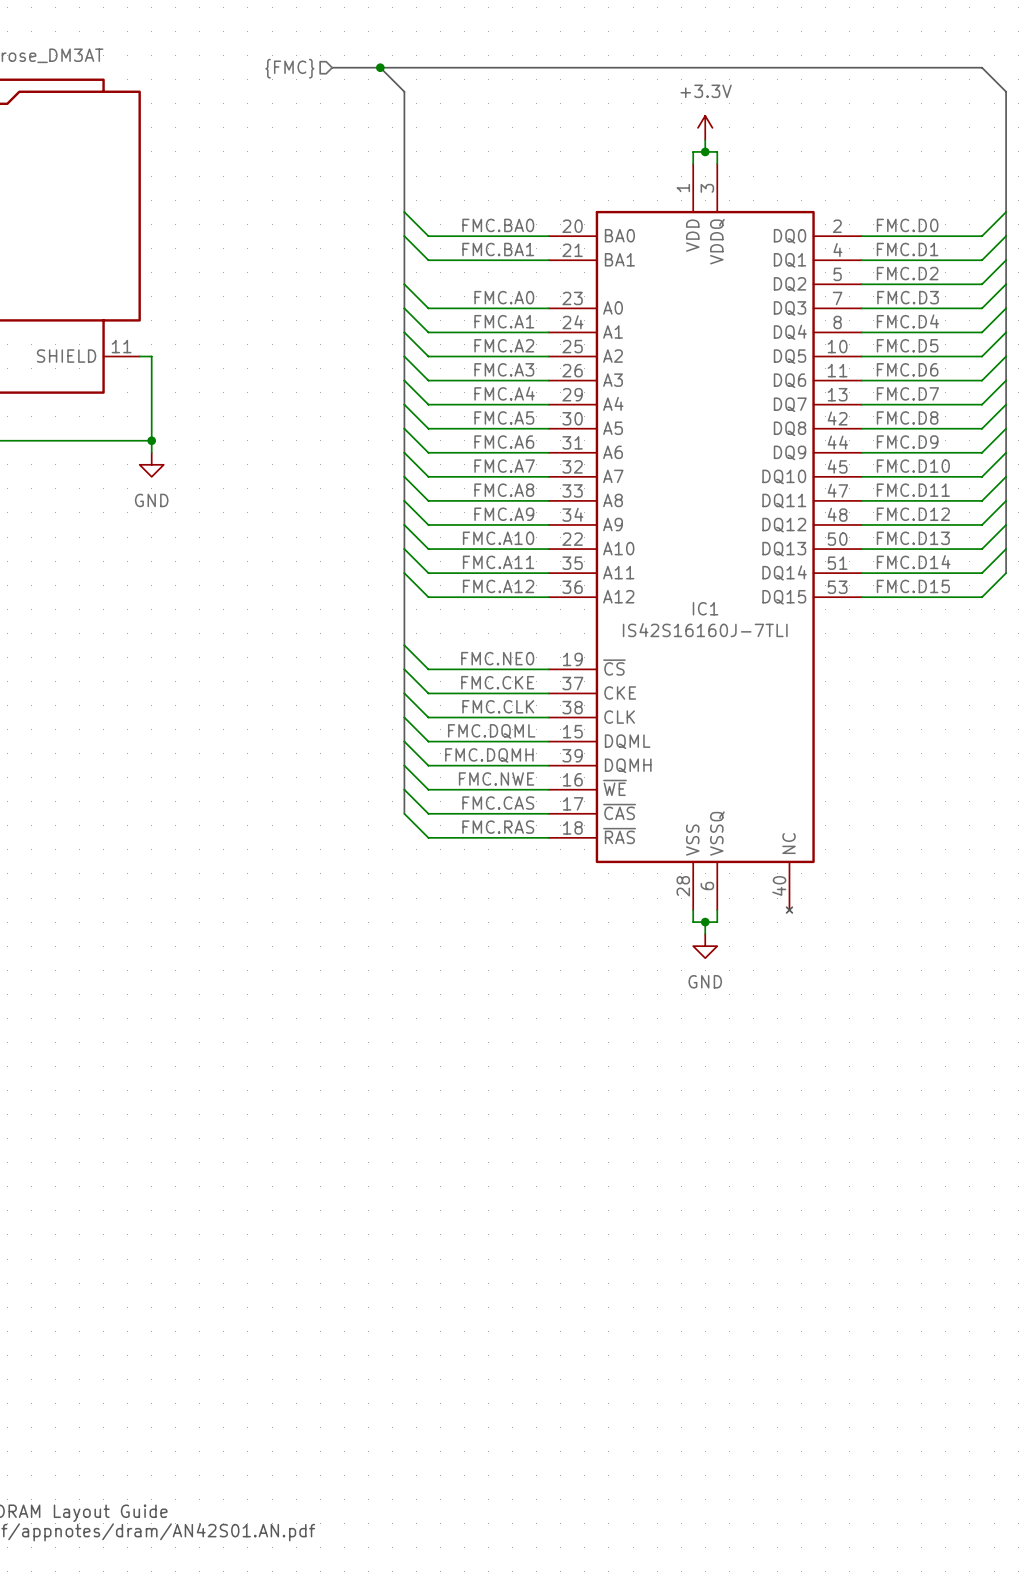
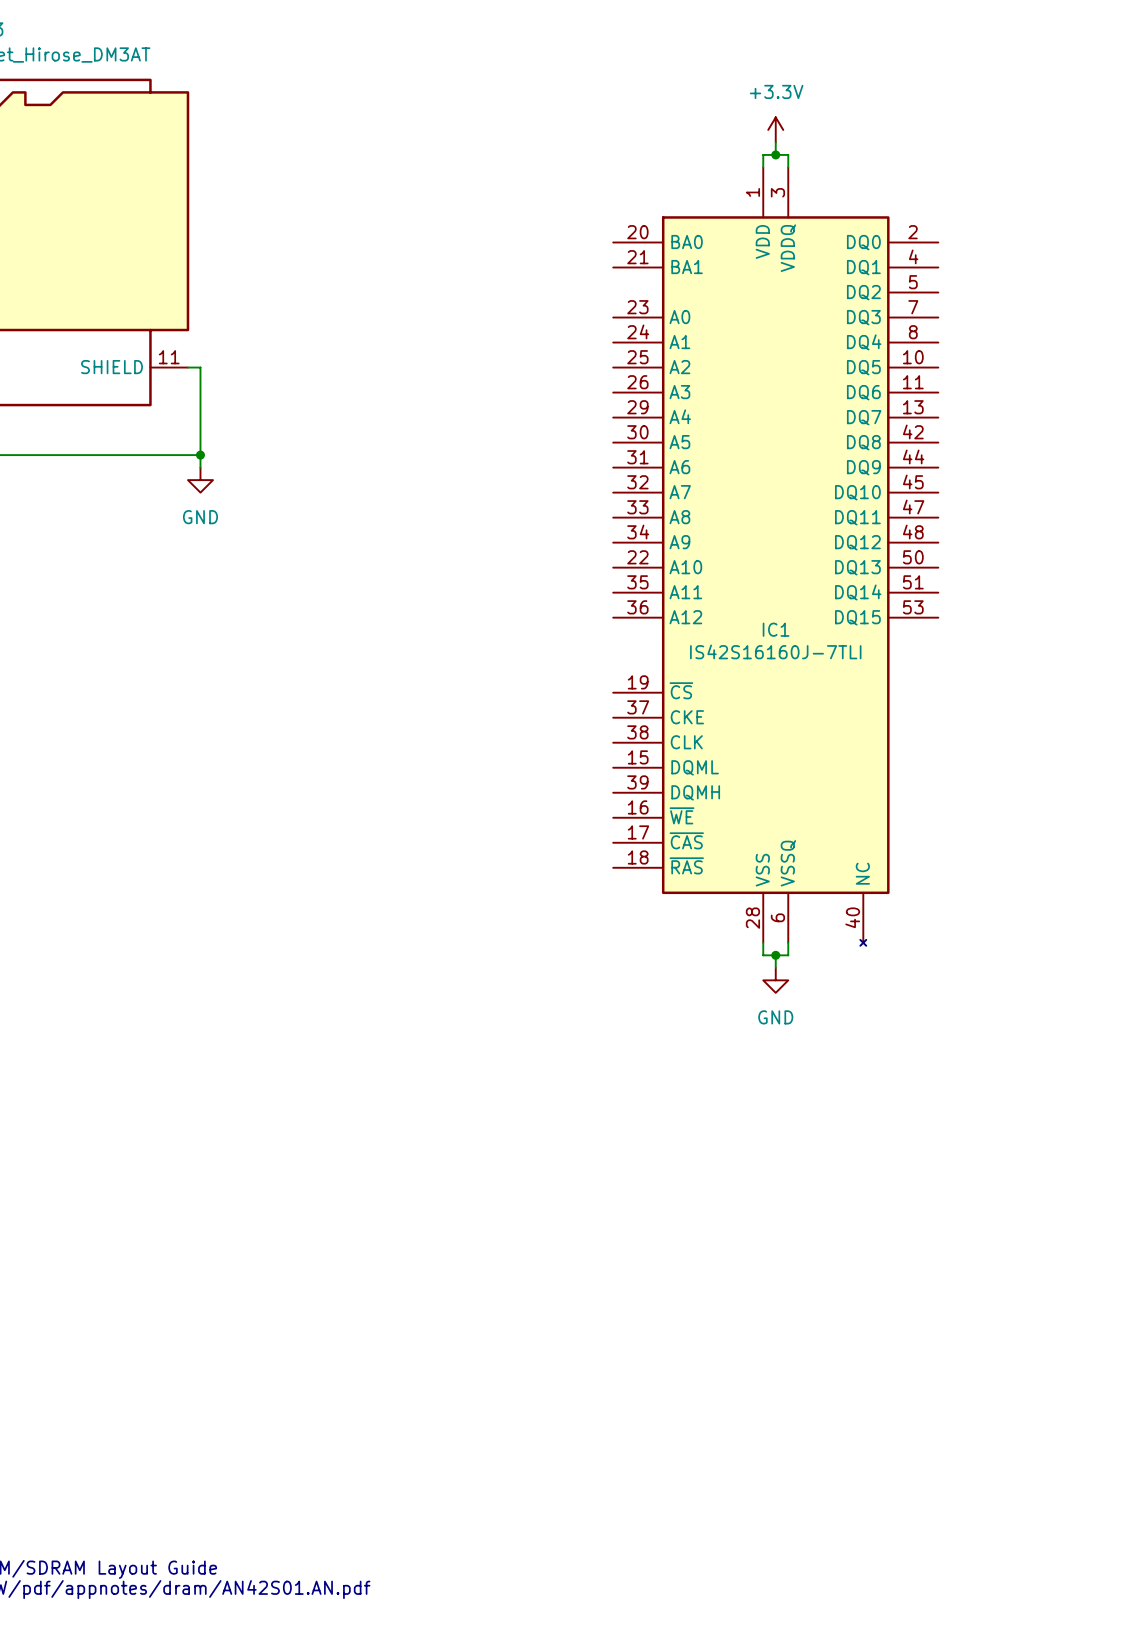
bus: (332, 67) (982, 67) (1006, 91) (1006, 573) -> none
bus: (380, 67) (404, 91) (404, 813) -> none
junction: (380, 67) -> none
hierarchical label: {FMC} (289, 68) -> none
wire: (404, 212) (428, 236) (548, 236) -> none
wire: (1006, 212) (982, 236) (861, 236) -> none
label: FMC.BA0 (498, 225) -> none
label: FMC.D0 (907, 225) -> none
wire: (404, 236) (428, 260) (548, 260) -> none
wire: (1006, 236) (982, 260) (861, 260) -> none
label: FMC.BA1 (498, 249) -> none
label: FMC.D1 (907, 249) -> none
wire: (1006, 260) (982, 284) (861, 284) -> none
label: FMC.D2 (907, 273) -> none
wire: (404, 284) (428, 308) (548, 308) -> none
wire: (1006, 284) (982, 308) (861, 308) -> none
label: FMC.A0 (504, 297) -> none
label: FMC.D3 (908, 297) -> none
wire: (404, 308) (428, 332) (548, 332) -> none
wire: (1006, 308) (982, 332) (861, 332) -> none
label: FMC.A1 (504, 321) -> none
label: FMC.D4 (907, 321) -> none
wire: (404, 332) (428, 356) (548, 356) -> none
wire: (1006, 332) (982, 356) (861, 356) -> none
label: FMC.A2 (504, 345) -> none
label: FMC.D5 (907, 345) -> none
wire: (404, 356) (428, 380) (548, 380) -> none
wire: (1006, 356) (982, 380) (861, 380) -> none
label: FMC.A3 (504, 369) -> none
label: FMC.D6 (907, 369) -> none
wire: (404, 380) (428, 404) (548, 404) -> none
wire: (1006, 380) (982, 404) (861, 404) -> none
label: FMC.A4 (504, 393) -> none
label: FMC.D7 (907, 393) -> none
wire: (404, 404) (428, 428) (548, 428) -> none
wire: (1006, 404) (982, 428) (861, 428) -> none
label: FMC.A5 (504, 417) -> none
label: FMC.D8 (907, 417) -> none
wire: (404, 428) (428, 452) (548, 452) -> none
wire: (1006, 428) (982, 452) (861, 452) -> none
label: FMC.A6 (504, 442) -> none
label: FMC.D9 (907, 442) -> none
wire: (404, 452) (428, 476) (548, 476) -> none
wire: (1006, 452) (982, 476) (861, 476) -> none
label: FMC.A7 (504, 466) -> none
label: FMC.D10 (913, 466) -> none
wire: (404, 476) (428, 500) (548, 500) -> none
wire: (1006, 476) (982, 500) (861, 500) -> none
label: FMC.A8 (504, 490) -> none
label: FMC.D11 (913, 490) -> none
wire: (404, 500) (428, 524) (548, 524) -> none
wire: (1006, 500) (982, 524) (861, 524) -> none
label: FMC.A9 (504, 514) -> none
label: FMC.D12 (913, 514) -> none
wire: (404, 524) (428, 549) (548, 549) -> none
wire: (1006, 524) (982, 549) (861, 549) -> none
label: FMC.A10 (498, 538) -> none
label: FMC.D13 (913, 538) -> none
wire: (404, 549) (428, 573) (548, 573) -> none
wire: (1006, 549) (982, 573) (861, 573) -> none
label: FMC.A11 (498, 562) -> none
label: FMC.D14 (913, 562) -> none
wire: (404, 573) (428, 597) (548, 597) -> none
wire: (1006, 573) (982, 597) (861, 597) -> none
label: FMC.A12 (498, 586) -> none
label: FMC.D15 (913, 586) -> none
wire: (404, 645) (428, 669) (548, 669) -> none
label: FMC.NE0 (497, 658) -> none
wire: (404, 669) (428, 693) (548, 693) -> none
label: FMC.CKE (497, 682) -> none
wire: (404, 693) (428, 717) (548, 717) -> none
label: FMC.CLK (498, 706) -> none
wire: (404, 717) (428, 741) (548, 741) -> none
label: FMC.DQML (491, 731) -> none
wire: (404, 741) (428, 765) (548, 765) -> none
label: FMC.DQMH (489, 755) -> none
wire: (404, 765) (428, 789) (548, 789) -> none
label: FMC.NWE (496, 778) -> none
wire: (404, 789) (428, 813) (548, 813) -> none
label: FMC.CAS (498, 803) -> none
wire: (404, 813) (428, 837) (548, 837) -> none
label: FMC.RAS (498, 827) -> none

